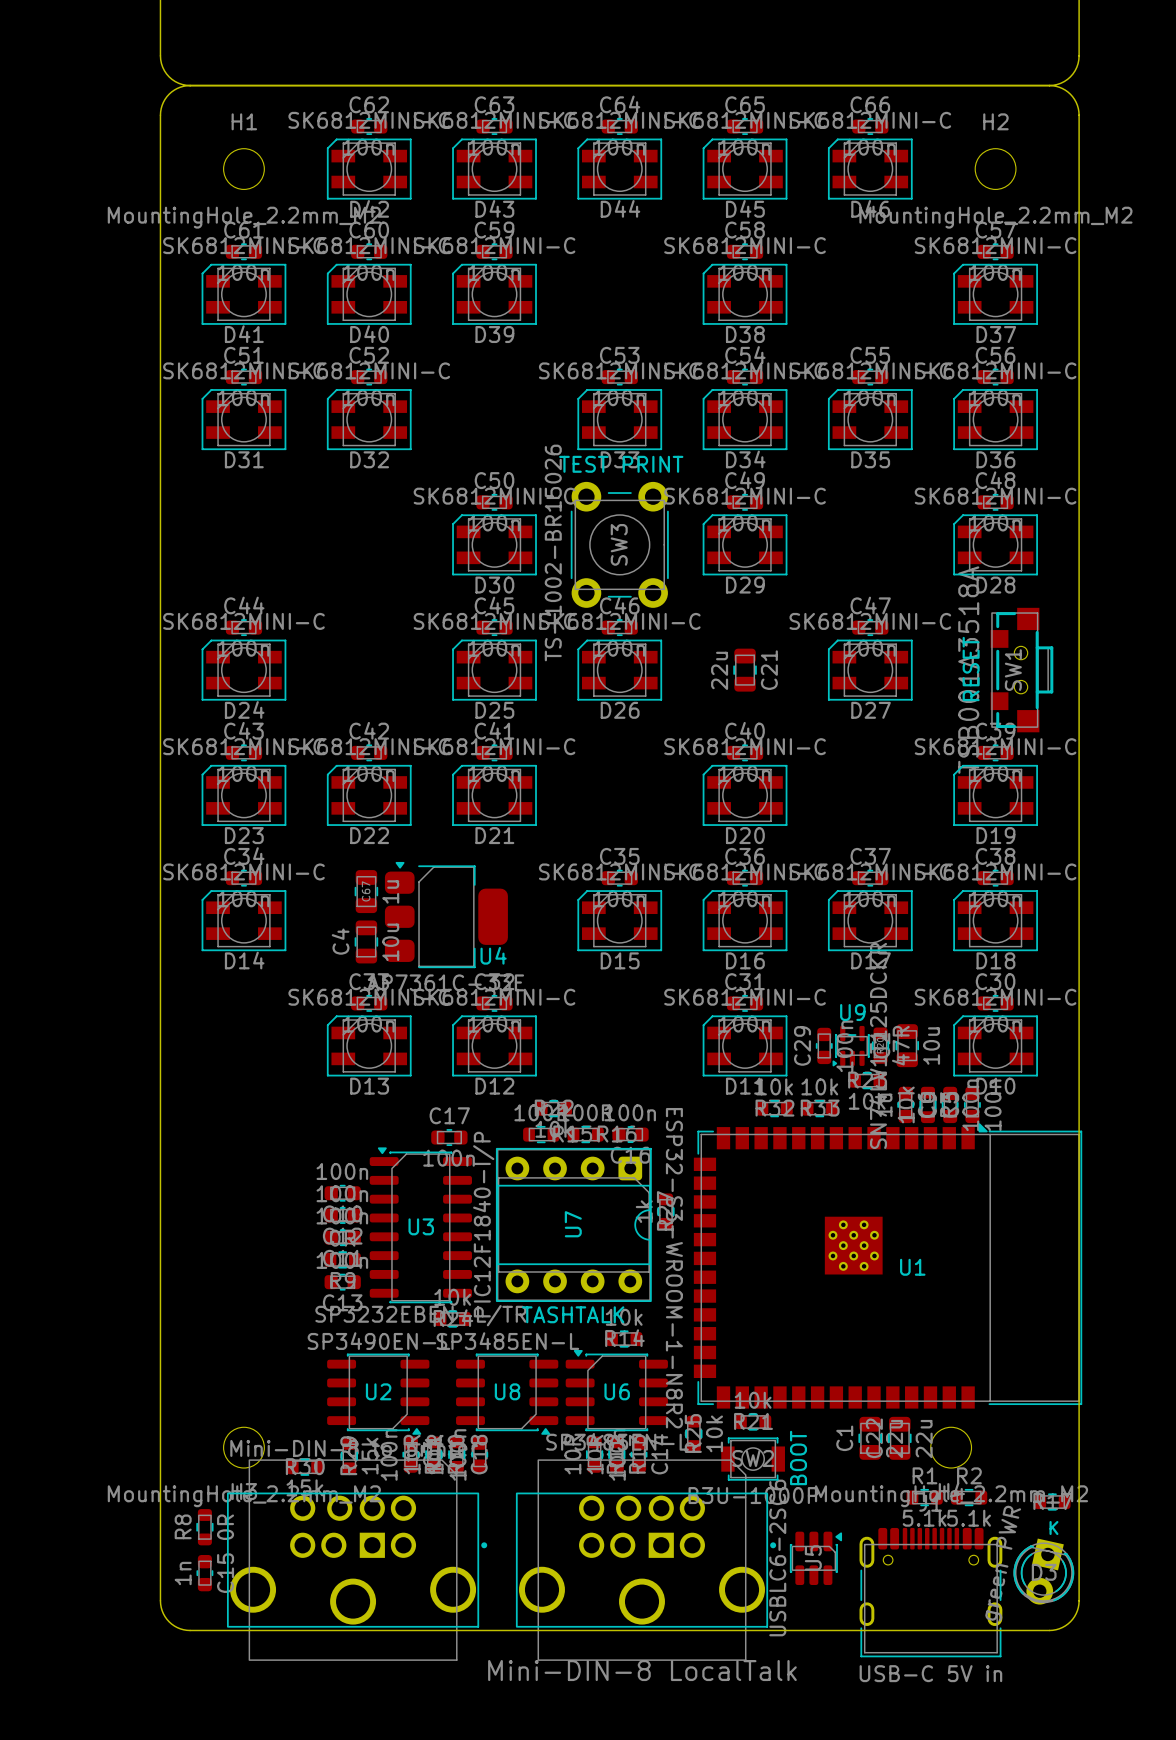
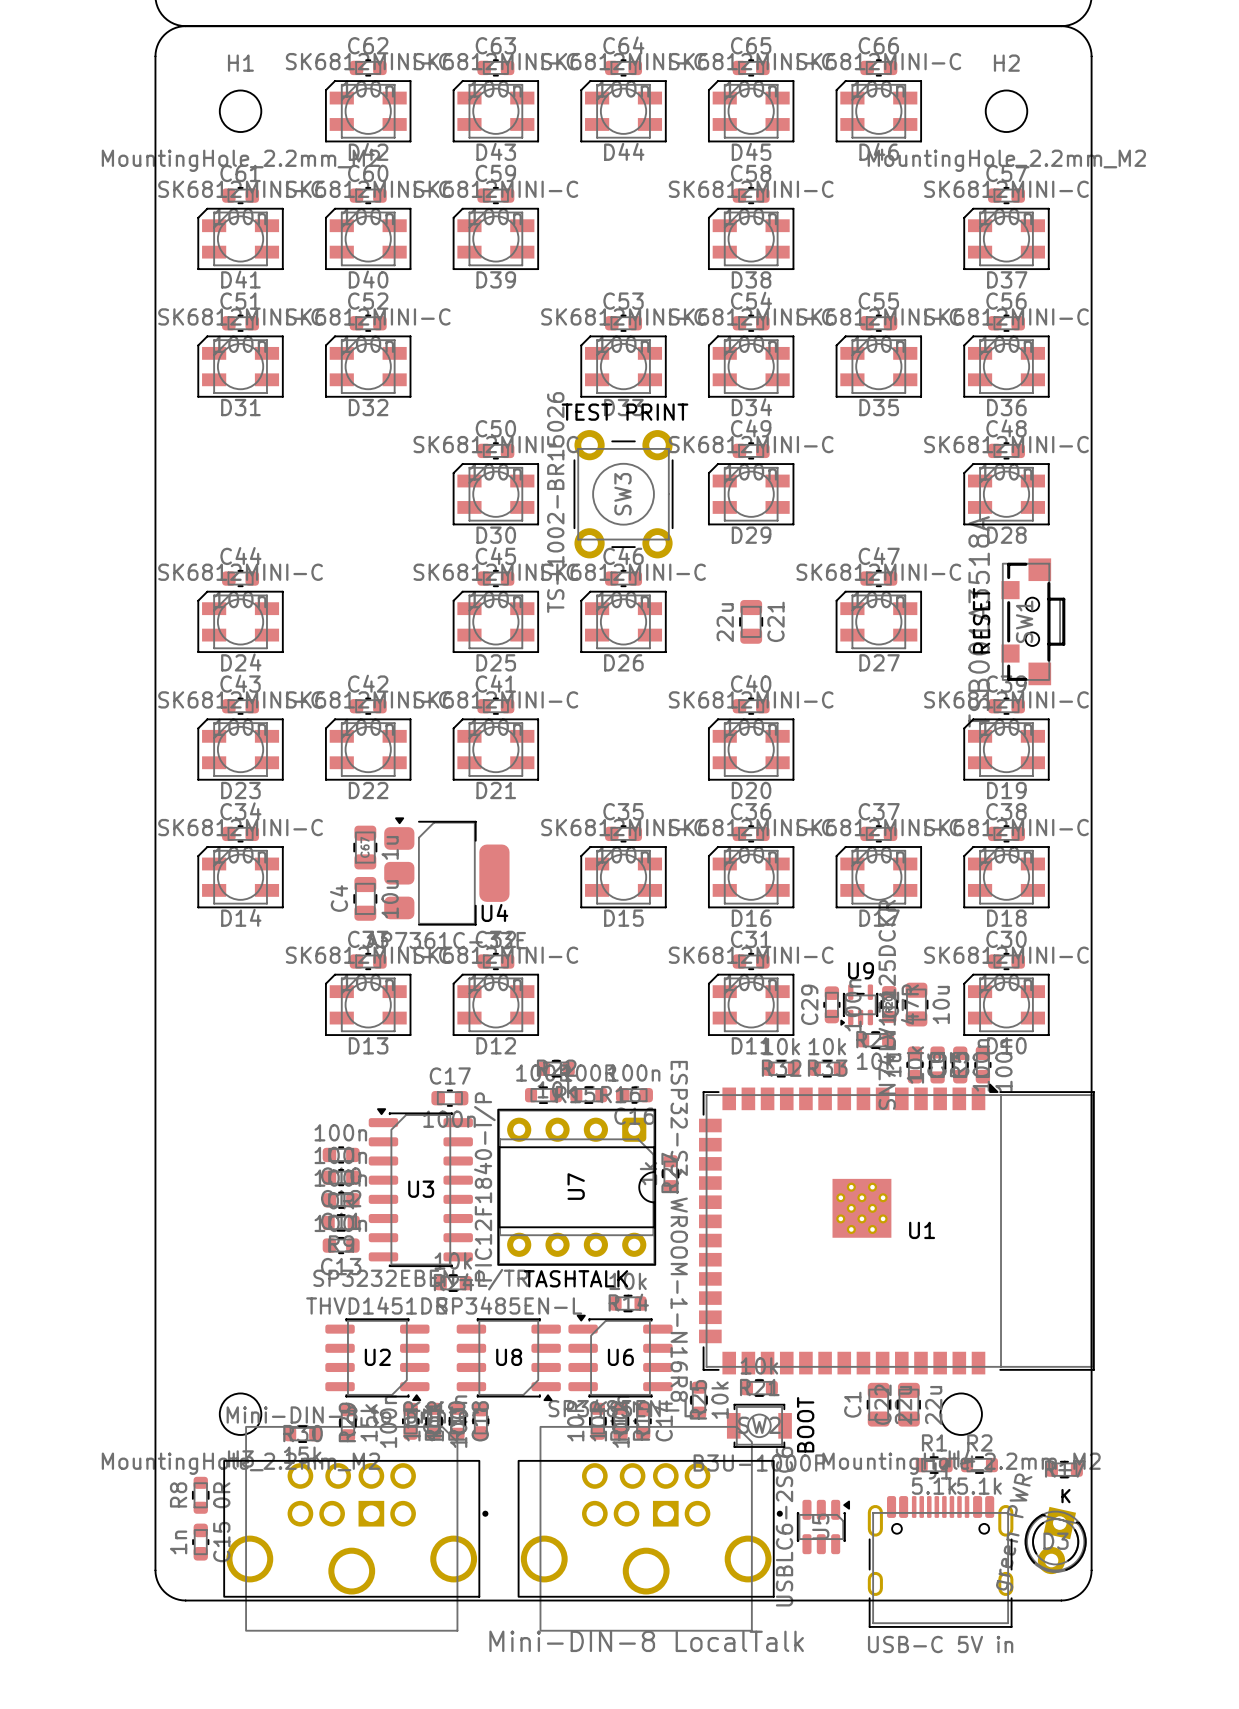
U1 value: ESP32-S3-WROOM-1-N8R2 (674, 1268) -> ESP32-S3-WROOM-1-N16R8 (679, 1231)
U2 value: SP3490EN-L (378, 1341) -> THVD1451DR (376, 1305)

